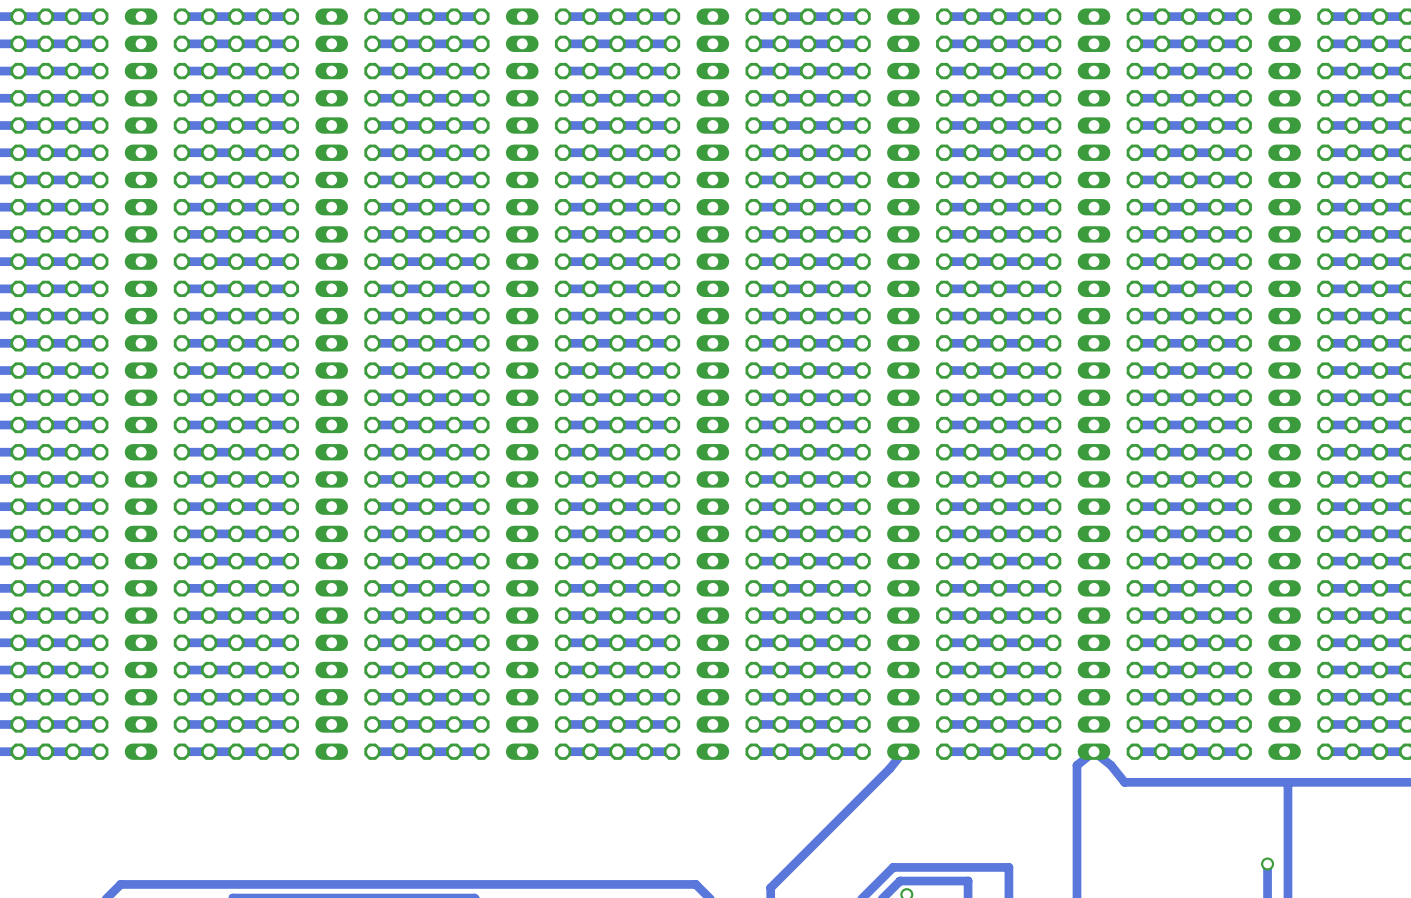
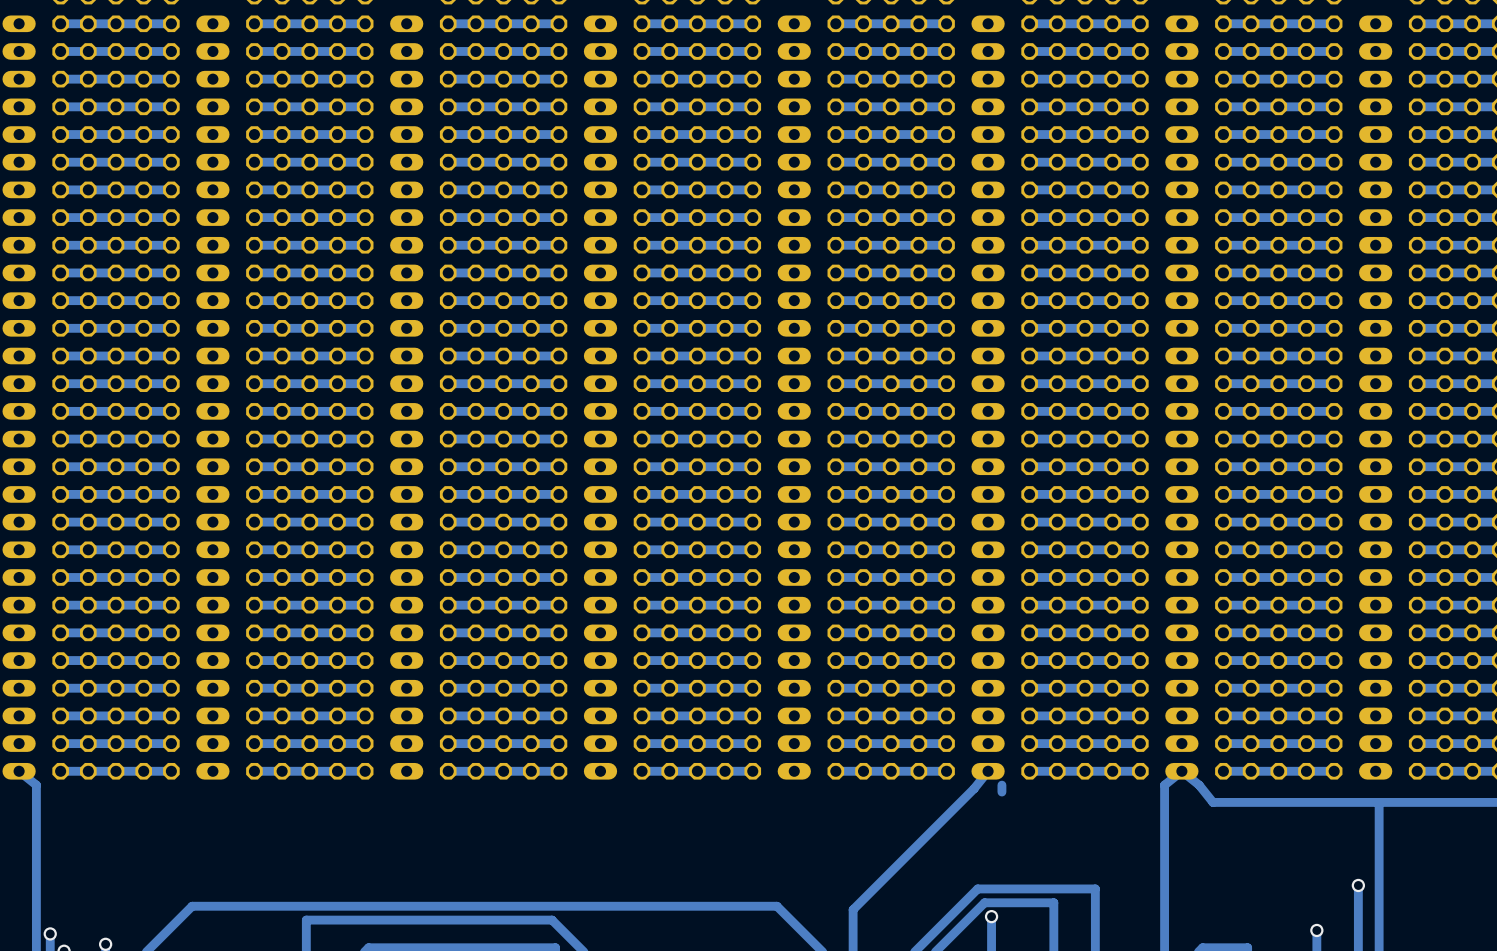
track: none -> (1001, 785) (1001, 792)

